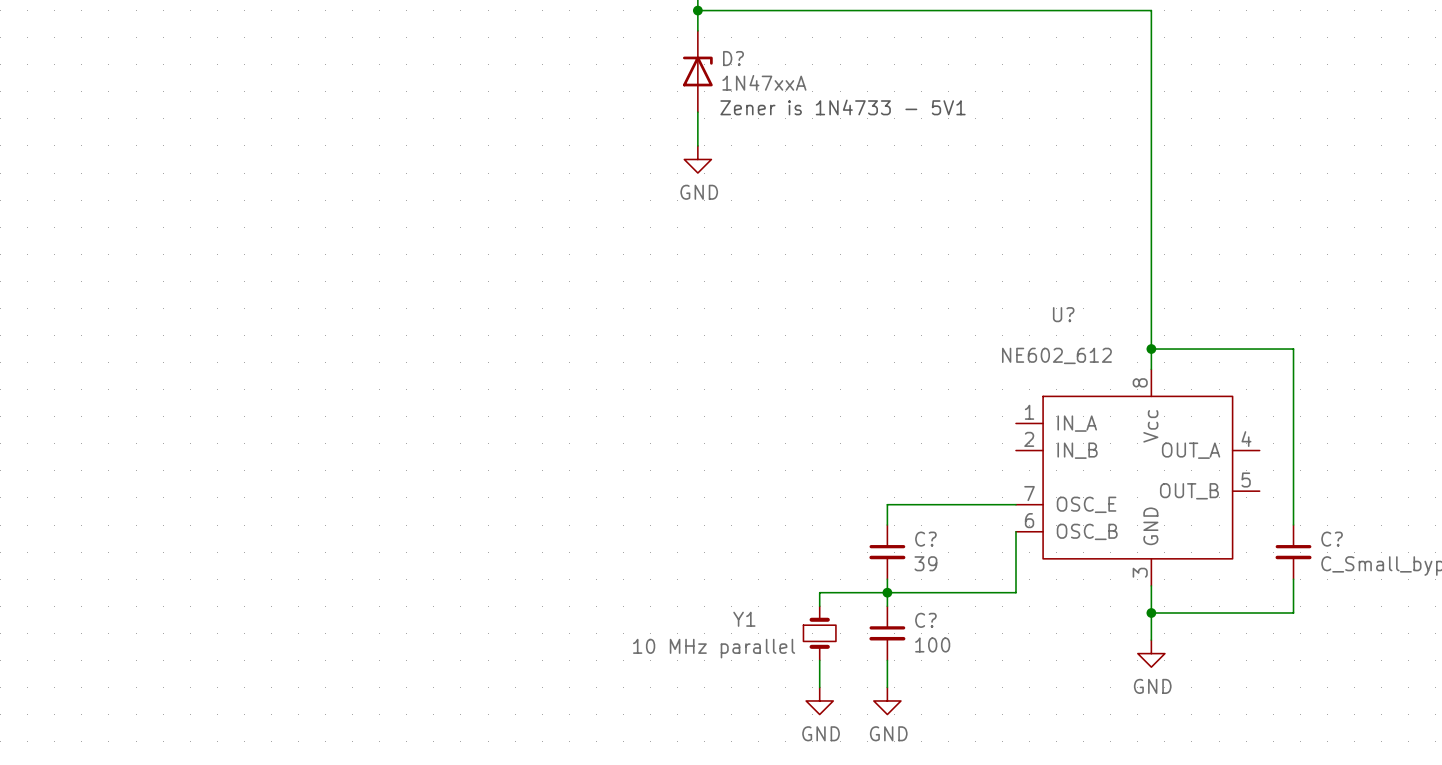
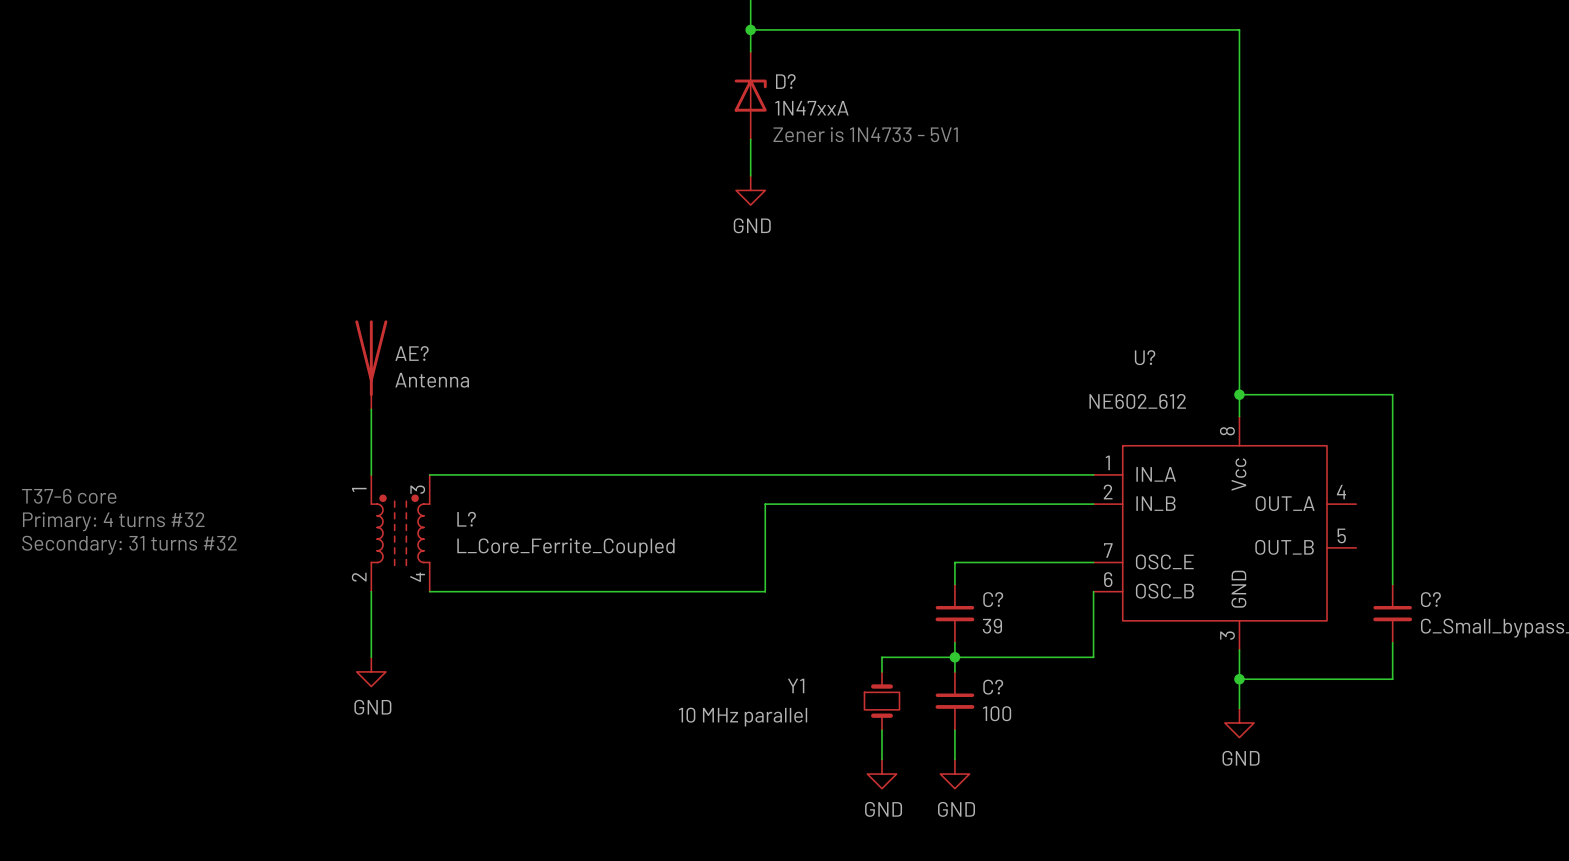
AE?: none -> Antenna (371, 364)
wire: none -> (371, 409) (371, 474)
wire: none -> (429, 474) (1093, 474)
text: none -> T37-6 core (69, 496)
wire: none -> (1093, 504) (765, 504) (765, 591) (429, 591)
text: none -> Primary: 4 turns #32 (113, 521)
L?: none -> L_Core_Ferrite_Coupled (400, 533)
text: none -> Secondary: 31 turns #32 (129, 545)
wire: none -> (371, 591) (371, 657)
power symbol: none -> GND (371, 671)

